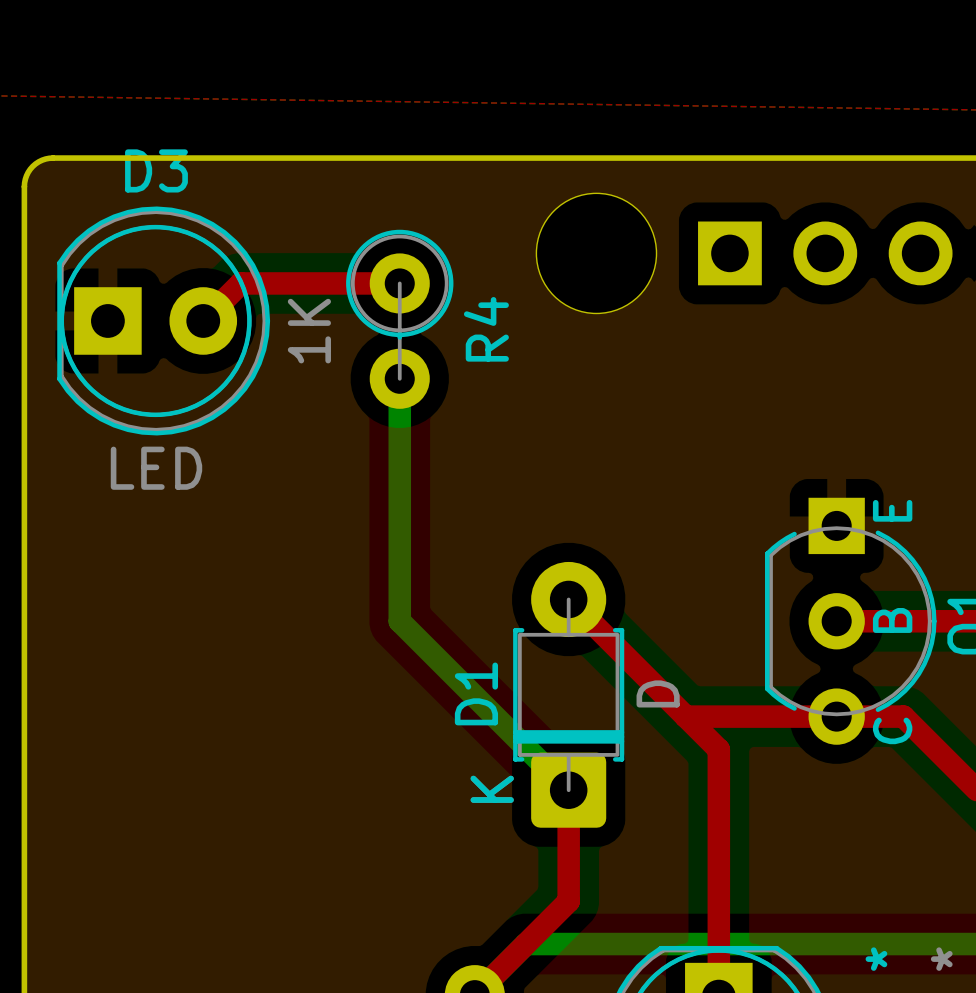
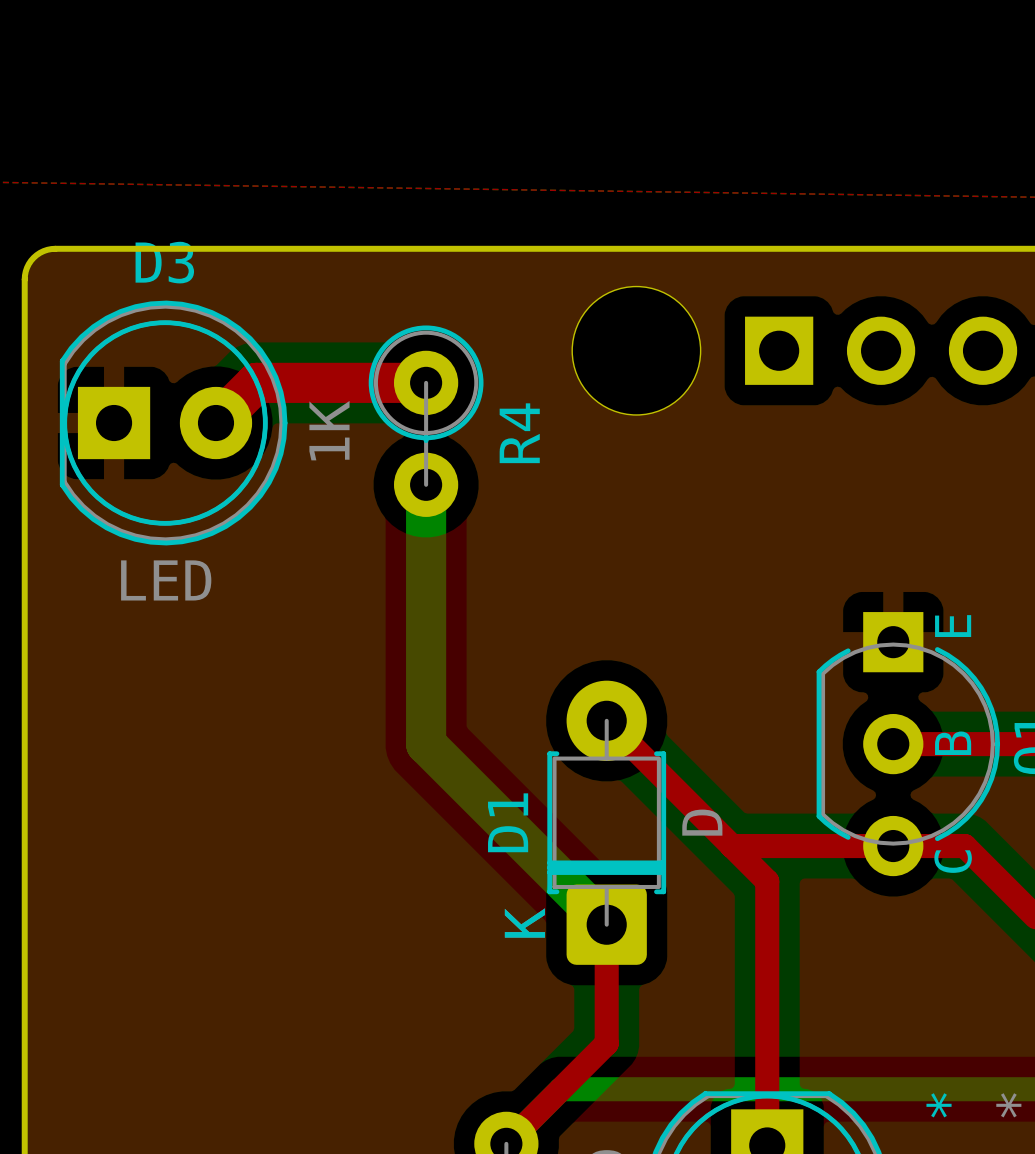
top track width: thin (399, 283) (240, 283) (203, 320) -> thick (426, 382) (256, 382) (215, 423)
bottom track width: thin (399, 378) (399, 621) (568, 790) -> thick (426, 484) (426, 744) (606, 924)

